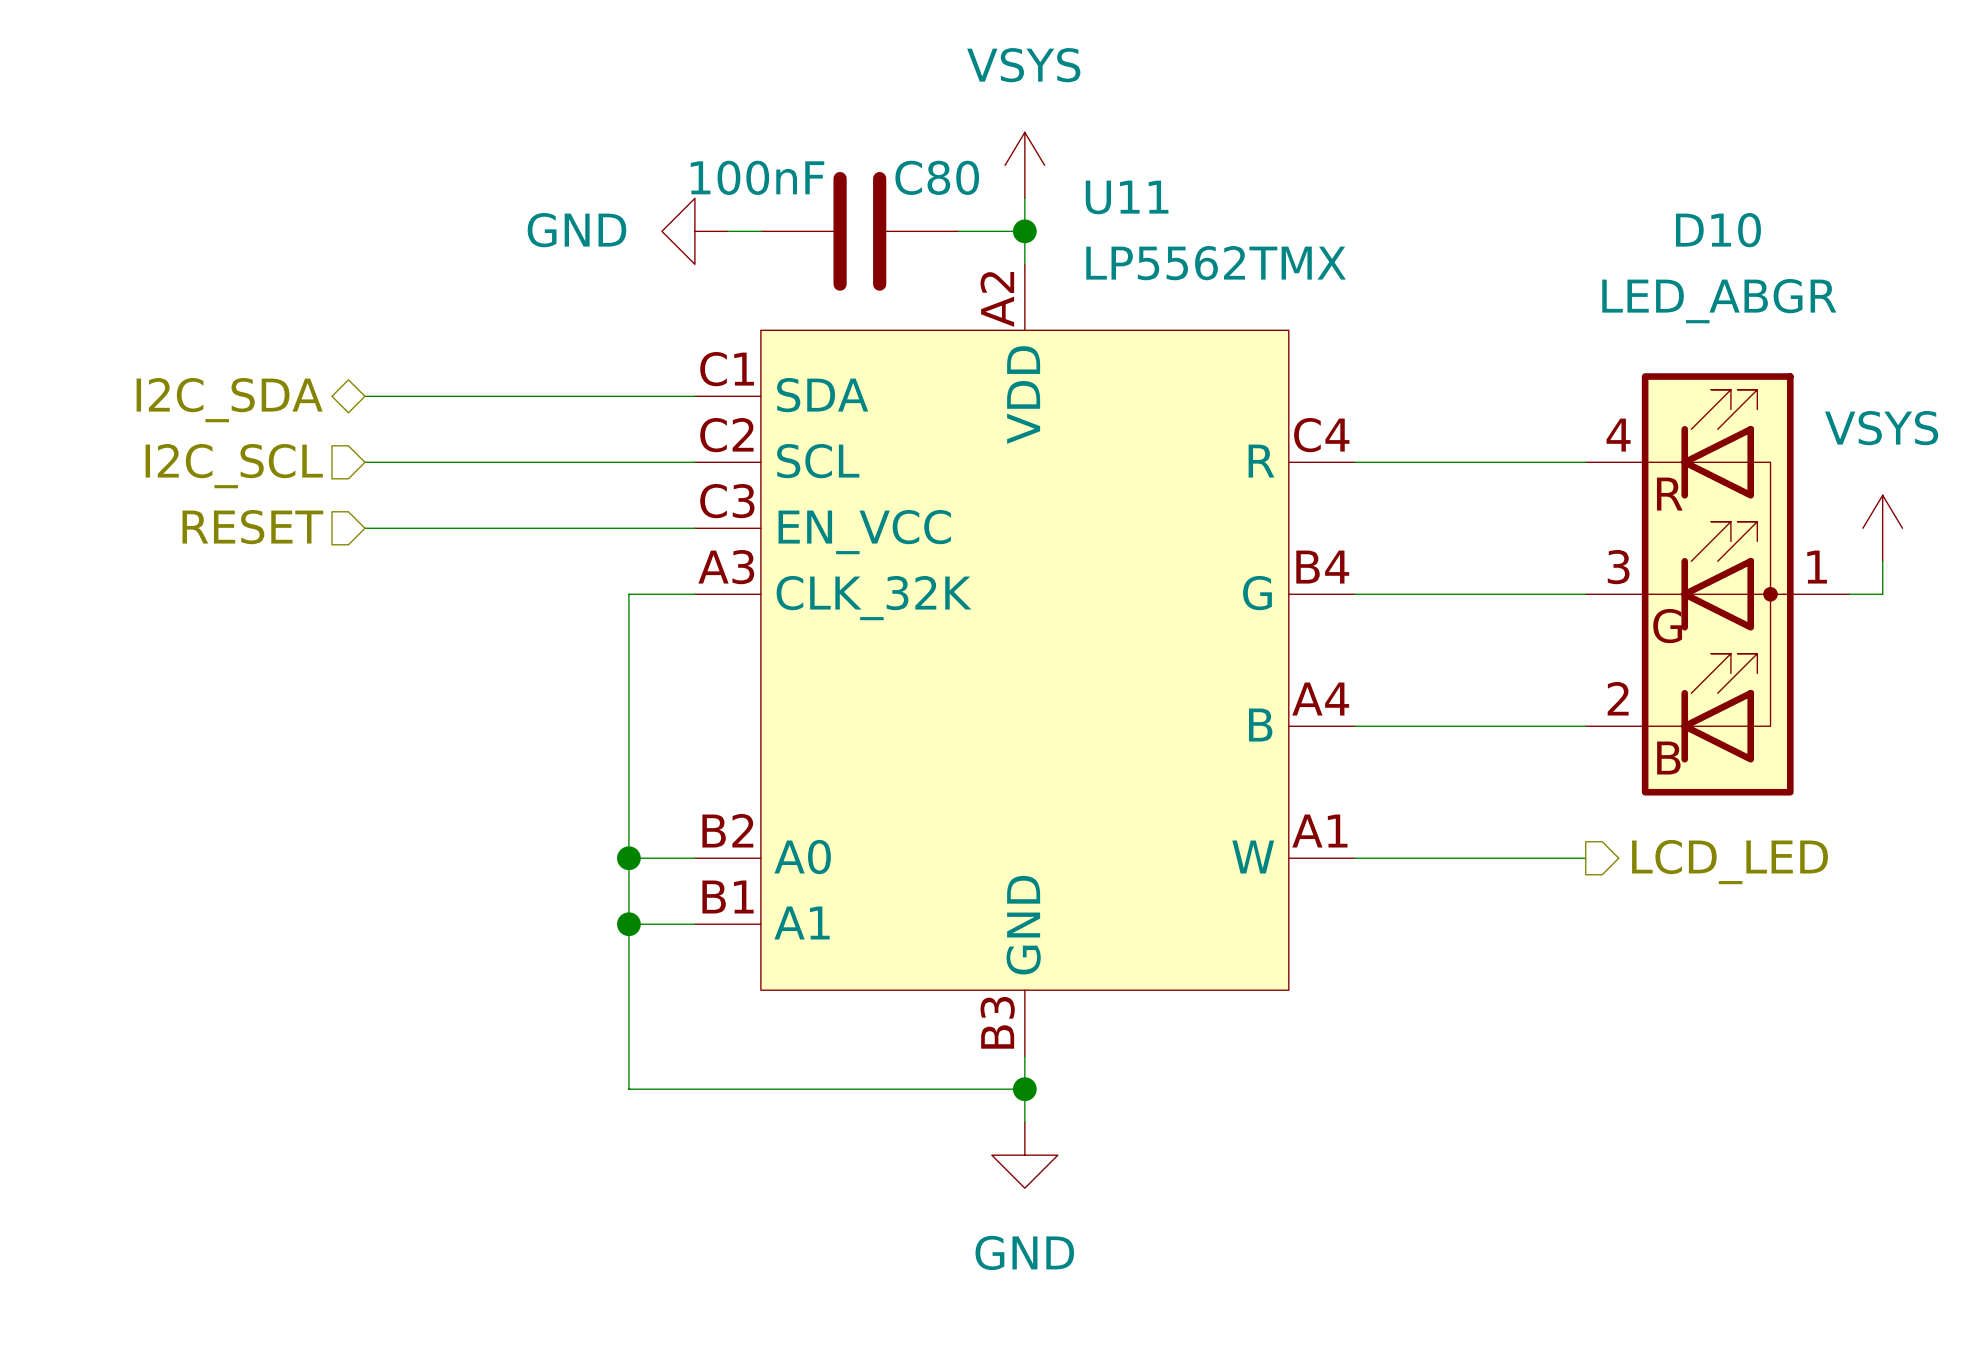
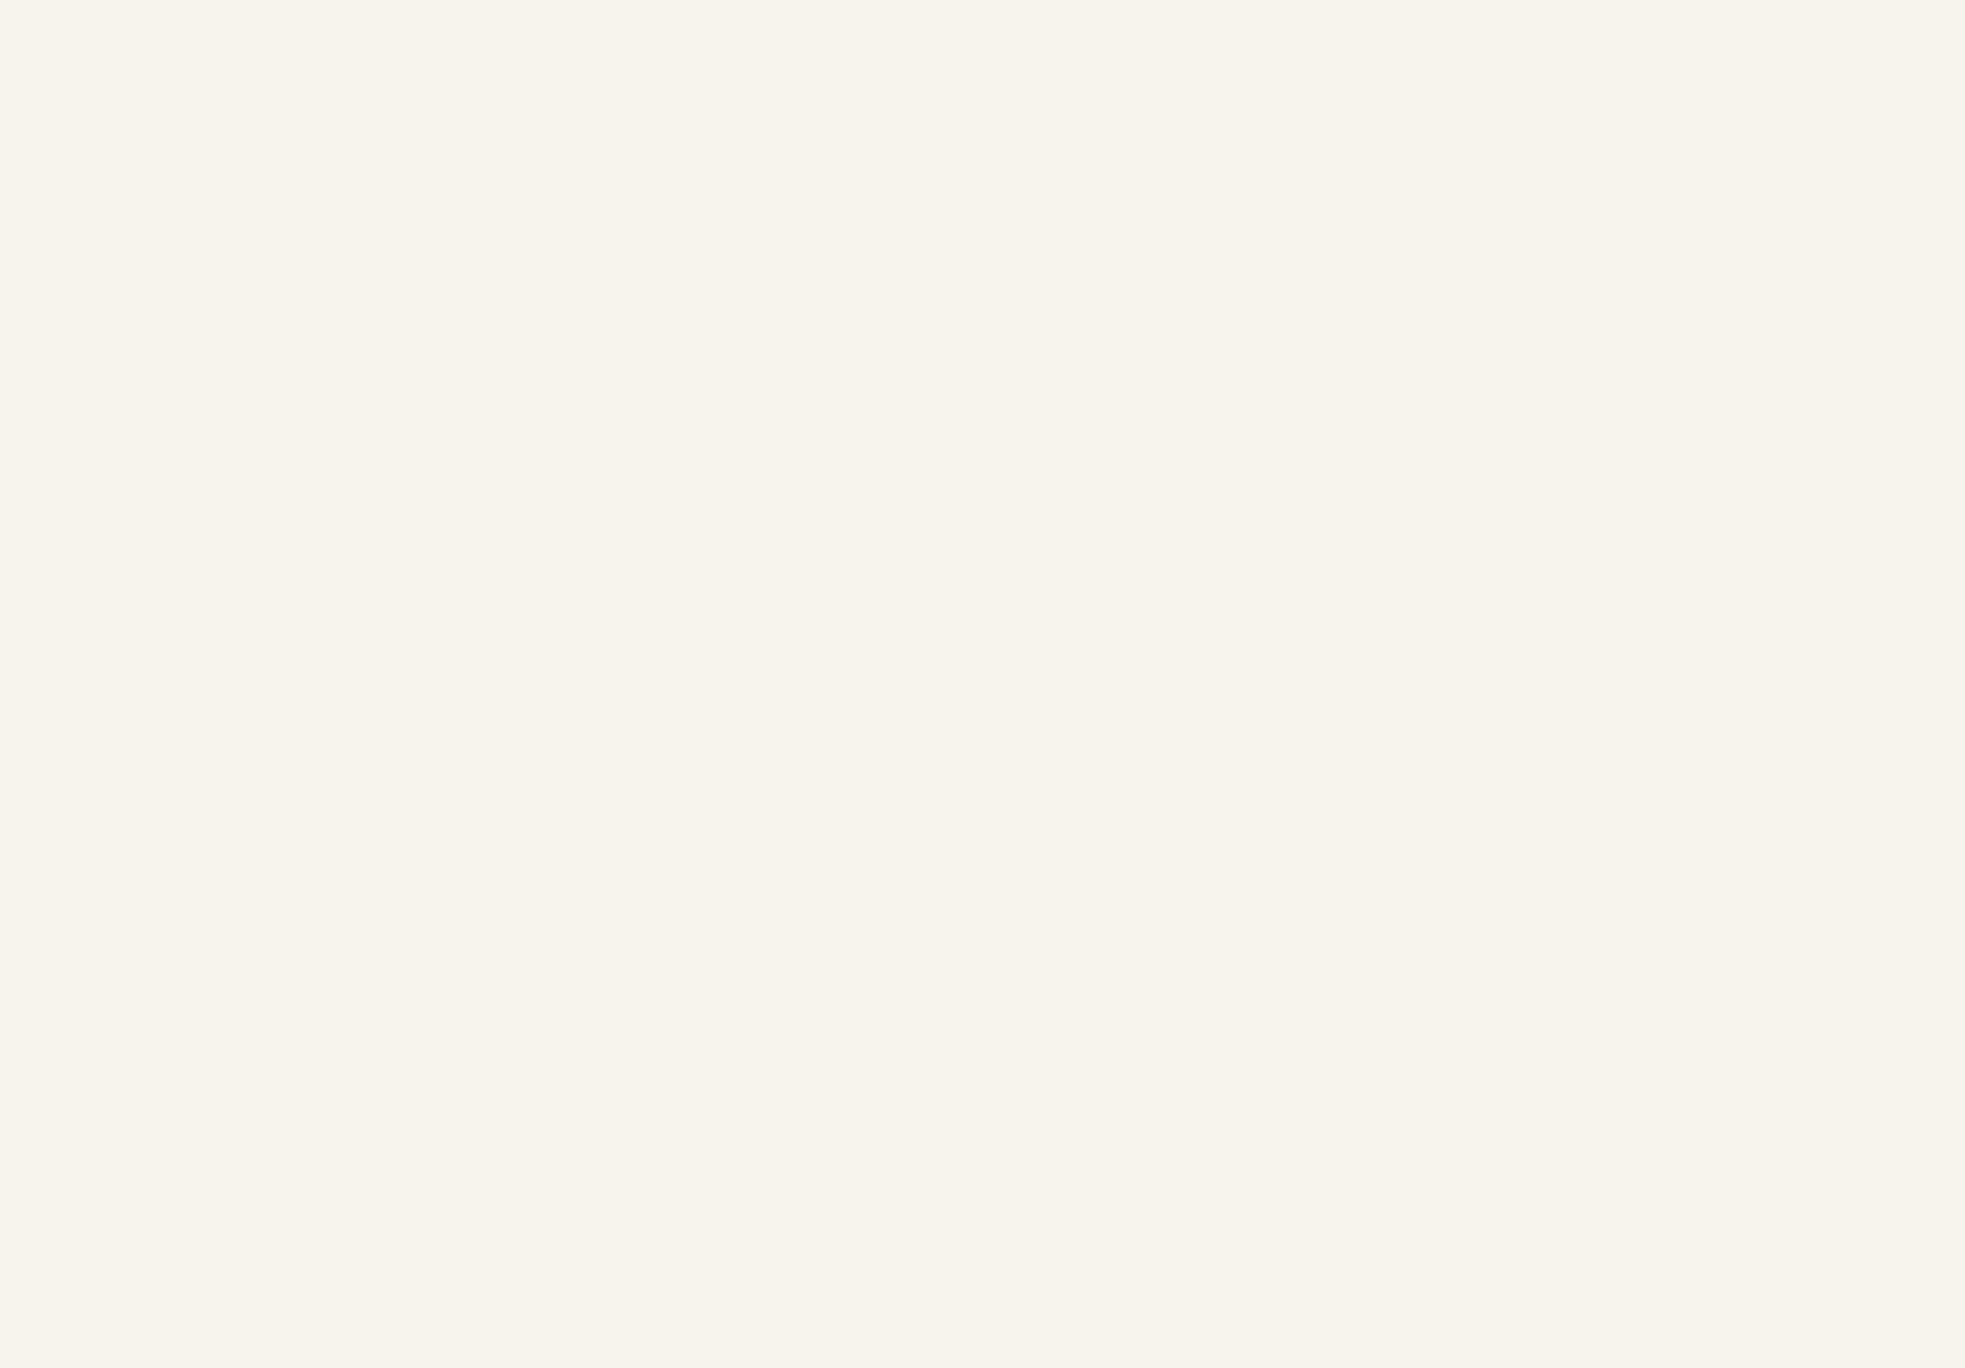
power symbol: VSYS (1024, 165) -> none
wire: (1024, 198) (1024, 264) -> none
power symbol: GND (694, 231) -> none
wire: (727, 231) (760, 231) -> none
C80: 100nF (859, 231) -> none
wire: (958, 231) (1024, 231) -> none
junction: (1024, 231) -> none
wire: (364, 396) (694, 396) -> none
hierarchical label: I2C_SDA (229, 400) -> none
wire: (364, 462) (694, 462) -> none
wire: (1354, 462) (1585, 462) -> none
hierarchical label: I2C_SCL (234, 466) -> none
hierarchical label: RESET (252, 527) -> none
wire: (364, 528) (694, 528) -> none
power symbol: VSYS (1882, 528) -> none
wire: (1882, 561) (1882, 594) (1849, 594) -> none
D10: LED_ABGR (1717, 584) -> none
wire: (694, 594) (628, 594) (628, 1089) (1024, 1089) -> none
wire: (1354, 594) (1585, 594) -> none
U11: LP5562TMX (1024, 660) -> none
wire: (1354, 726) (1585, 726) -> none
wire: (628, 858) (694, 858) -> none
junction: (628, 858) -> none
wire: (1354, 858) (1585, 858) -> none
hierarchical label: LCD_LED (1730, 862) -> none
wire: (628, 924) (694, 924) -> none
junction: (628, 924) -> none
wire: (1024, 1056) (1024, 1122) -> none
junction: (1024, 1089) -> none
power symbol: GND (1024, 1155) -> none

